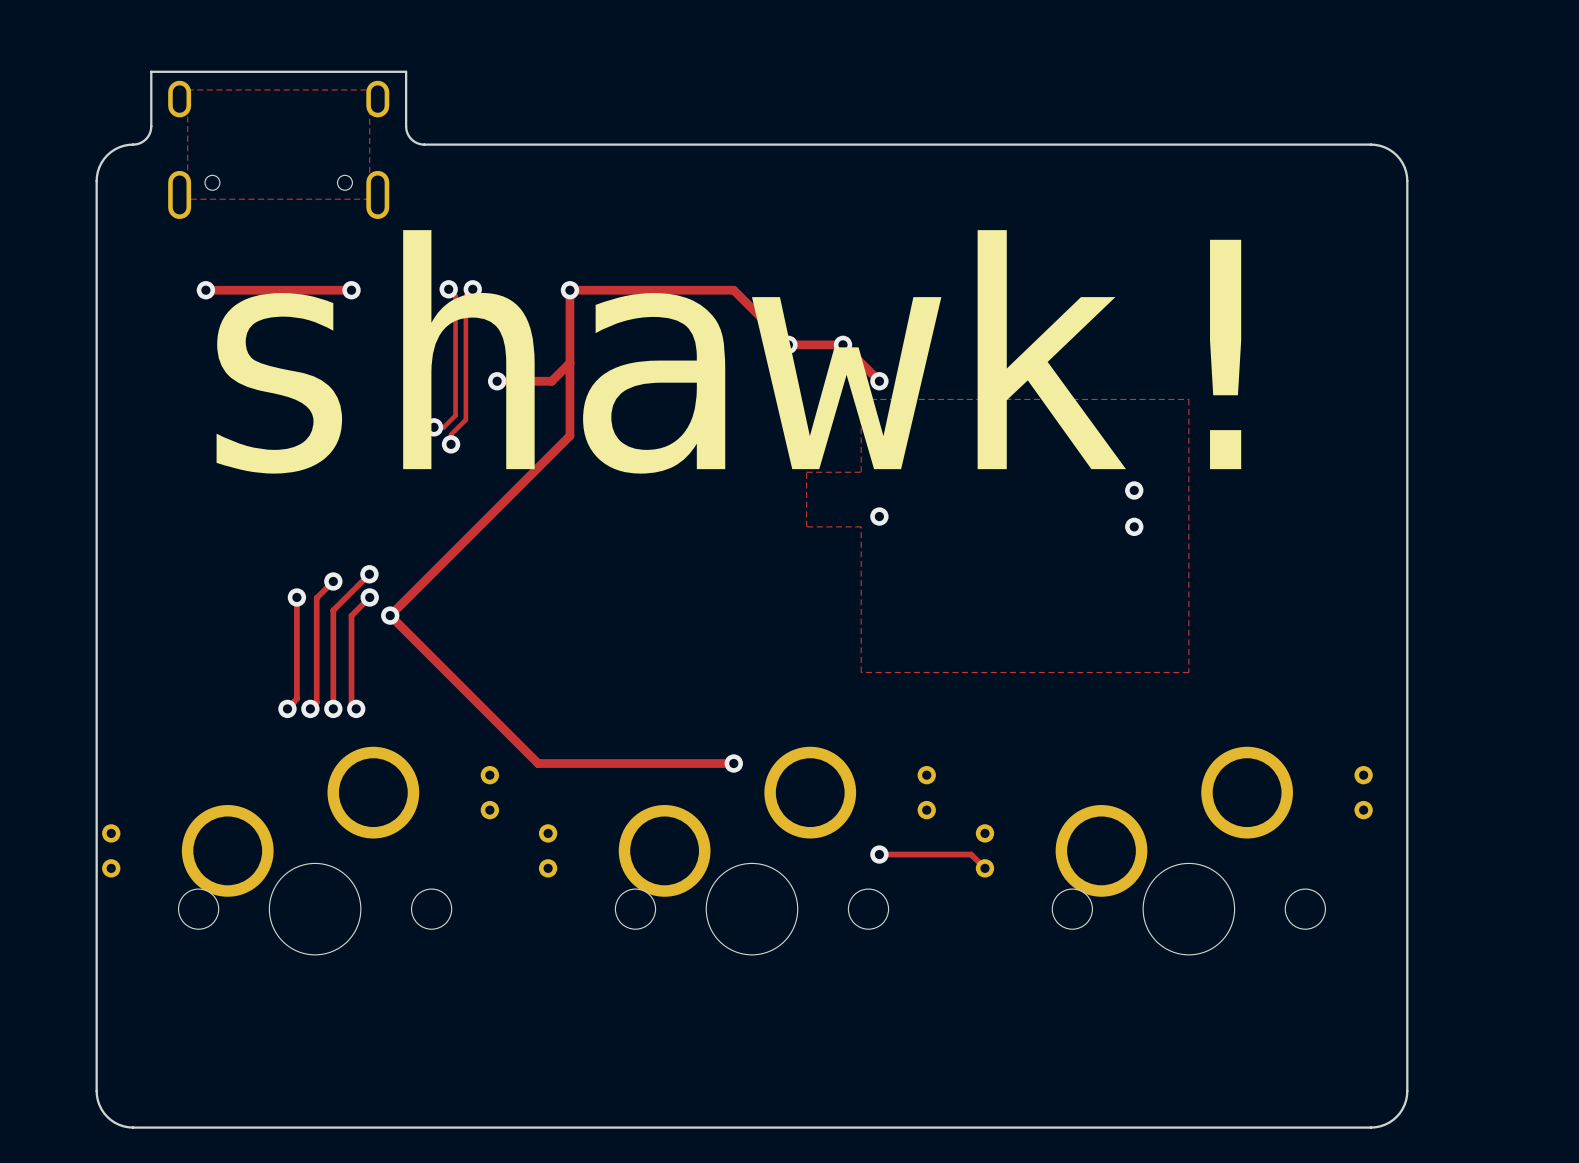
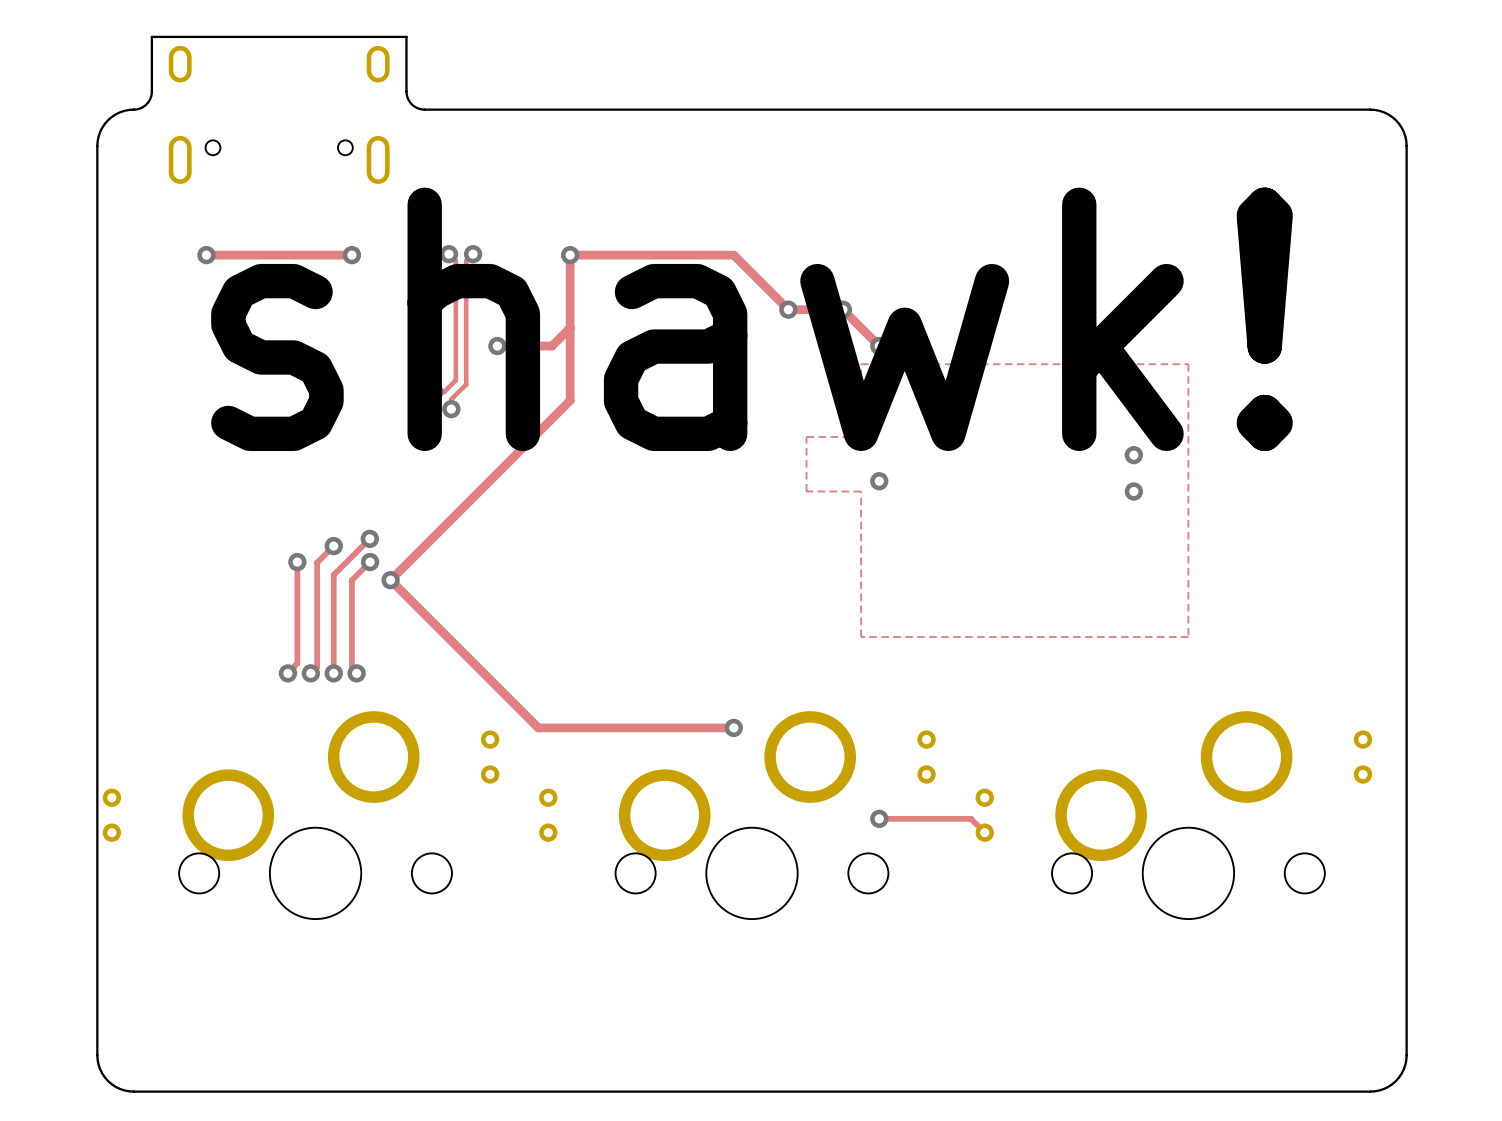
zone outline: (187, 90) (187, 199) (369, 199) (369, 90) (187, 90) -> none

